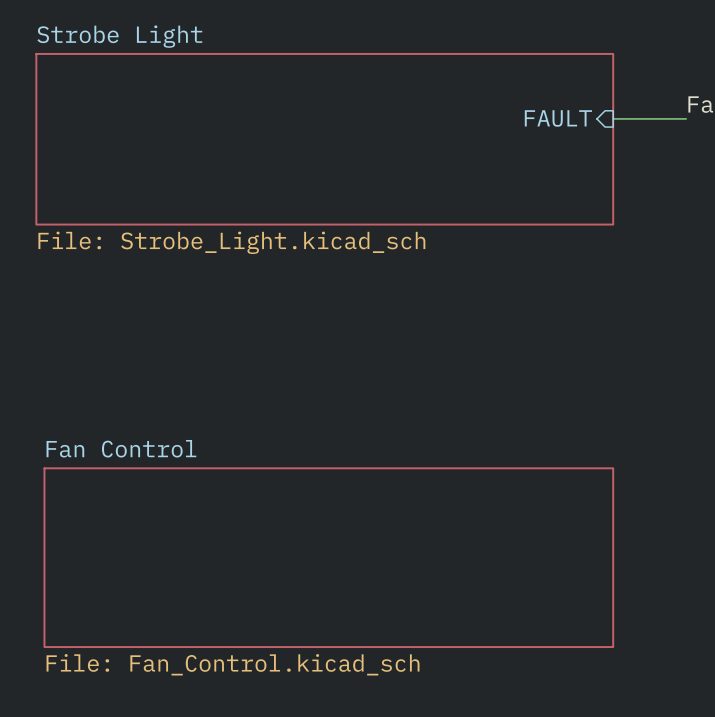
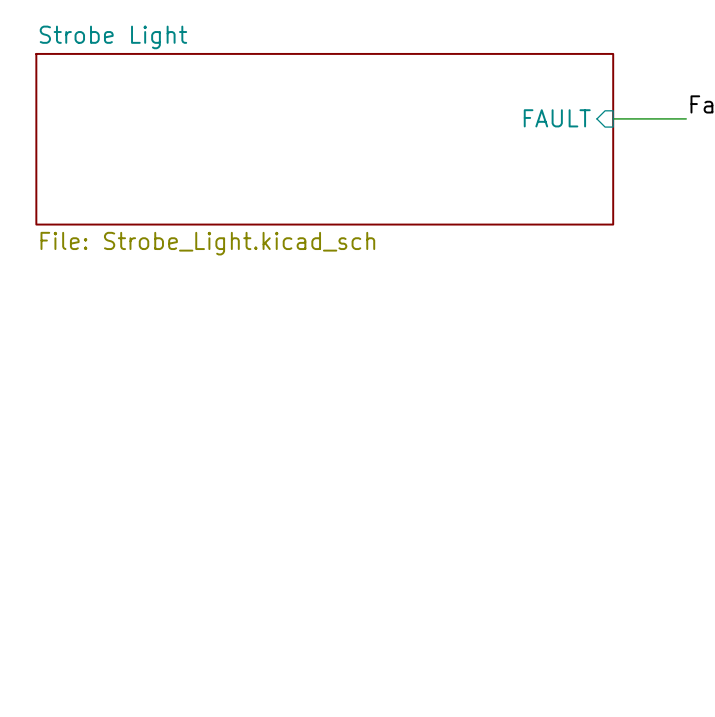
sheet Fan Control: File: Fan_Control.kicad_sch (328, 557) -> none

